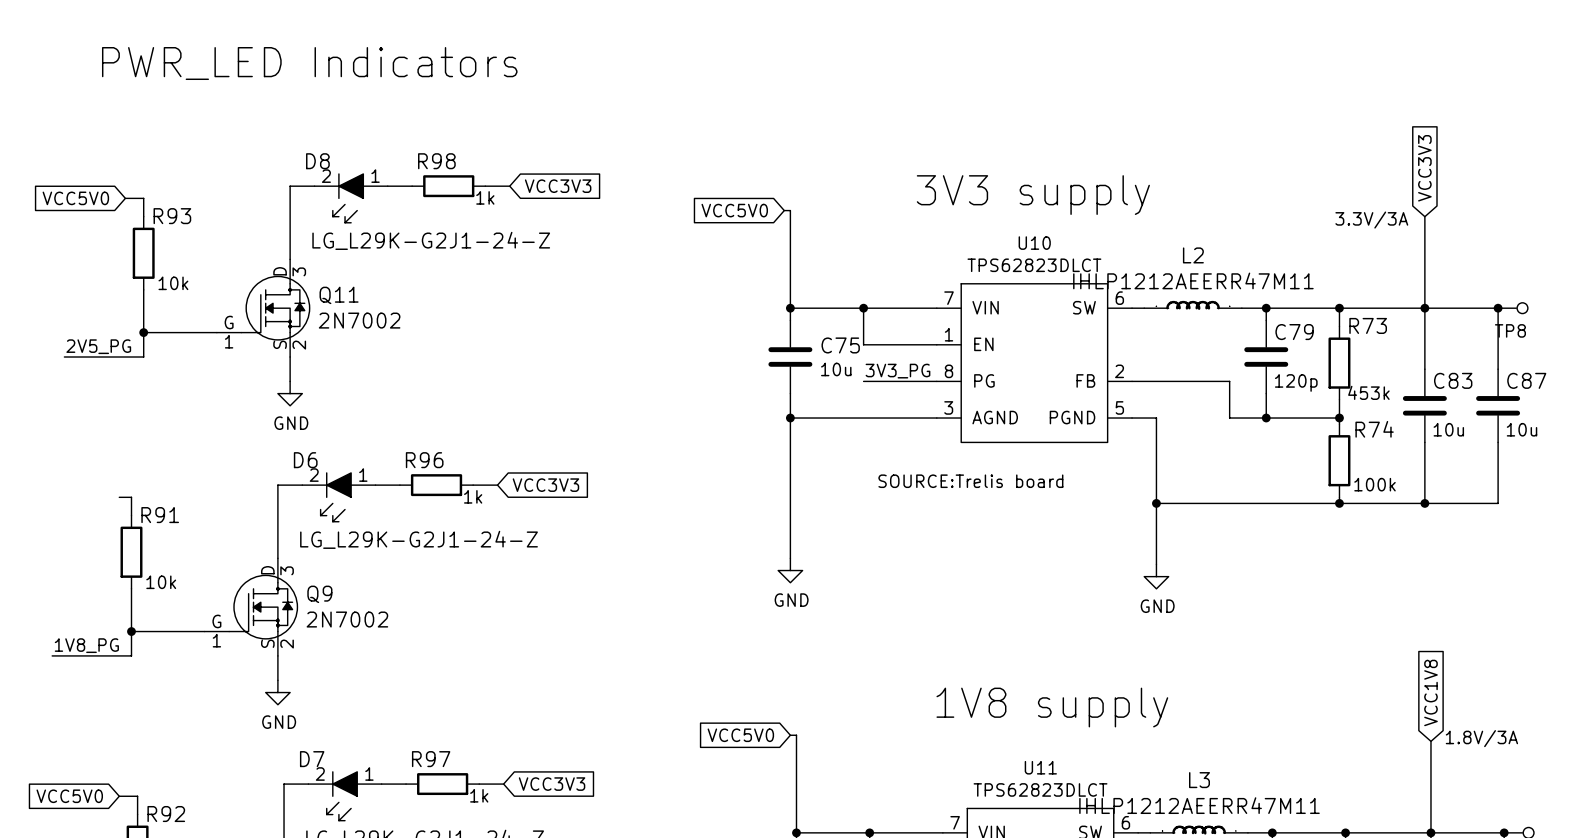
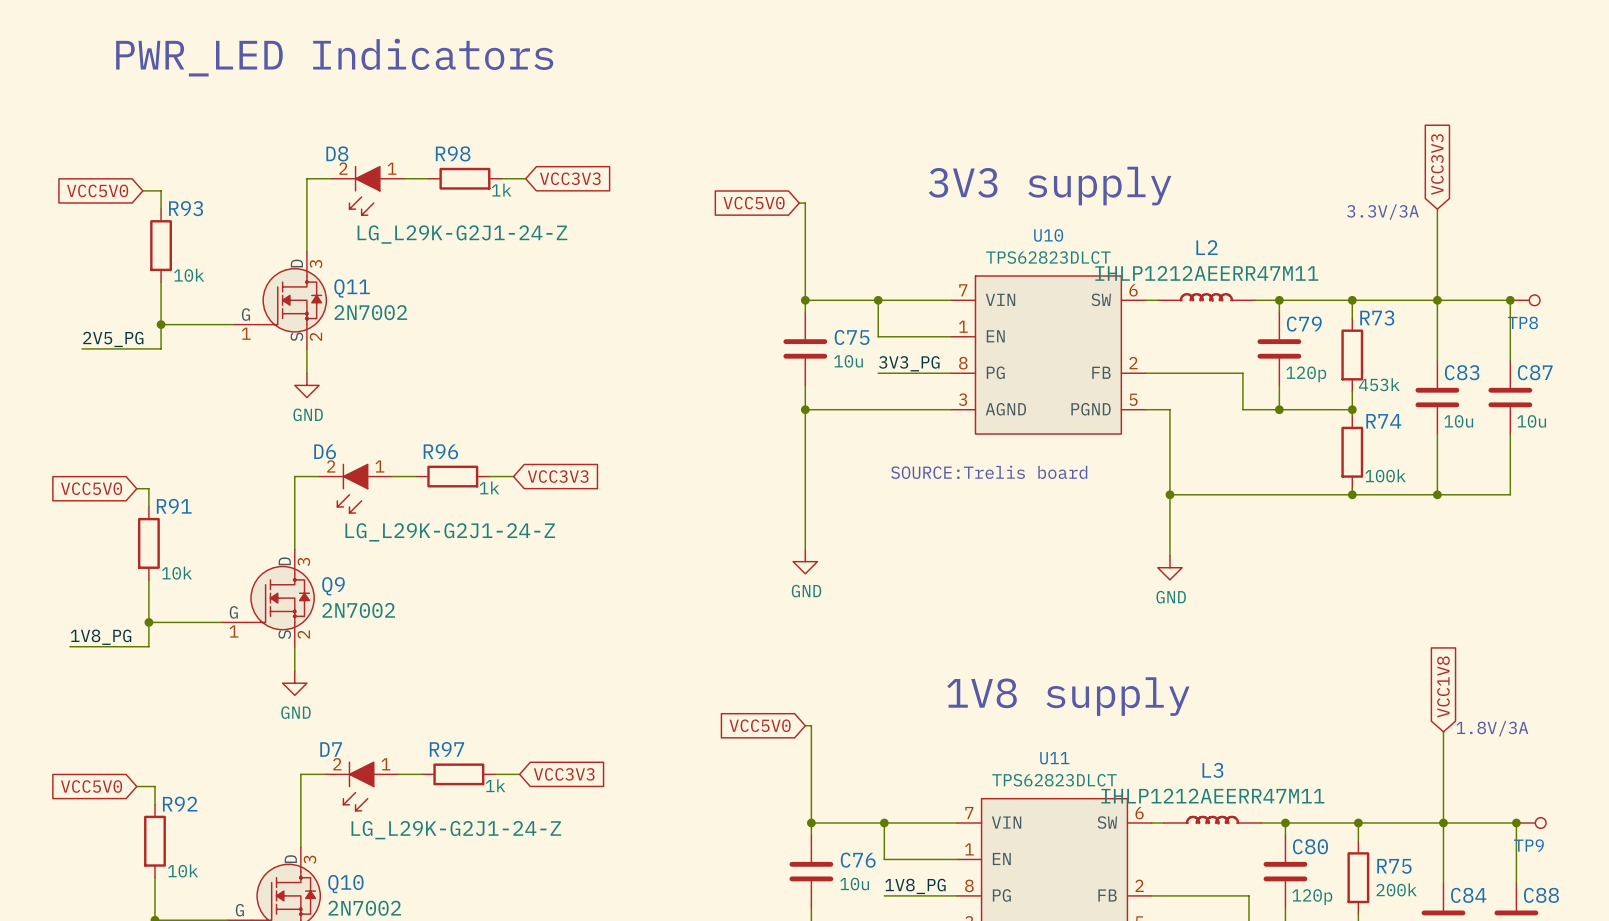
global label: none -> VCC5V0 (91, 488)

